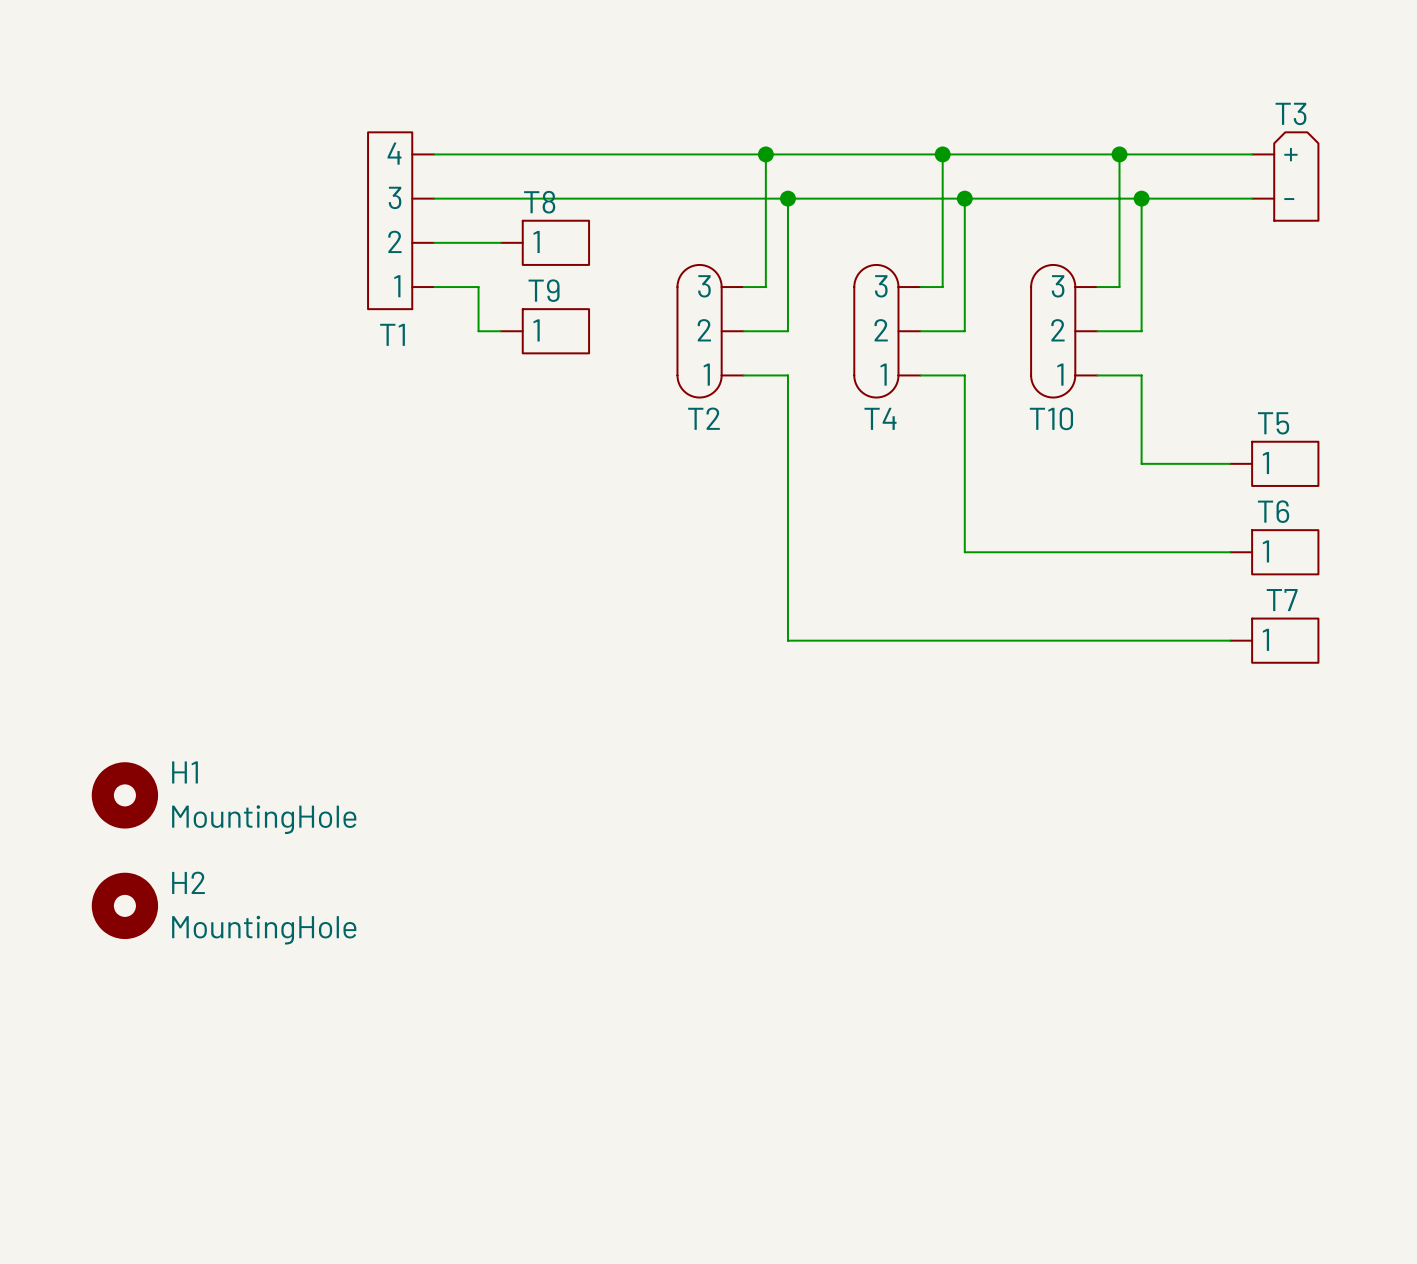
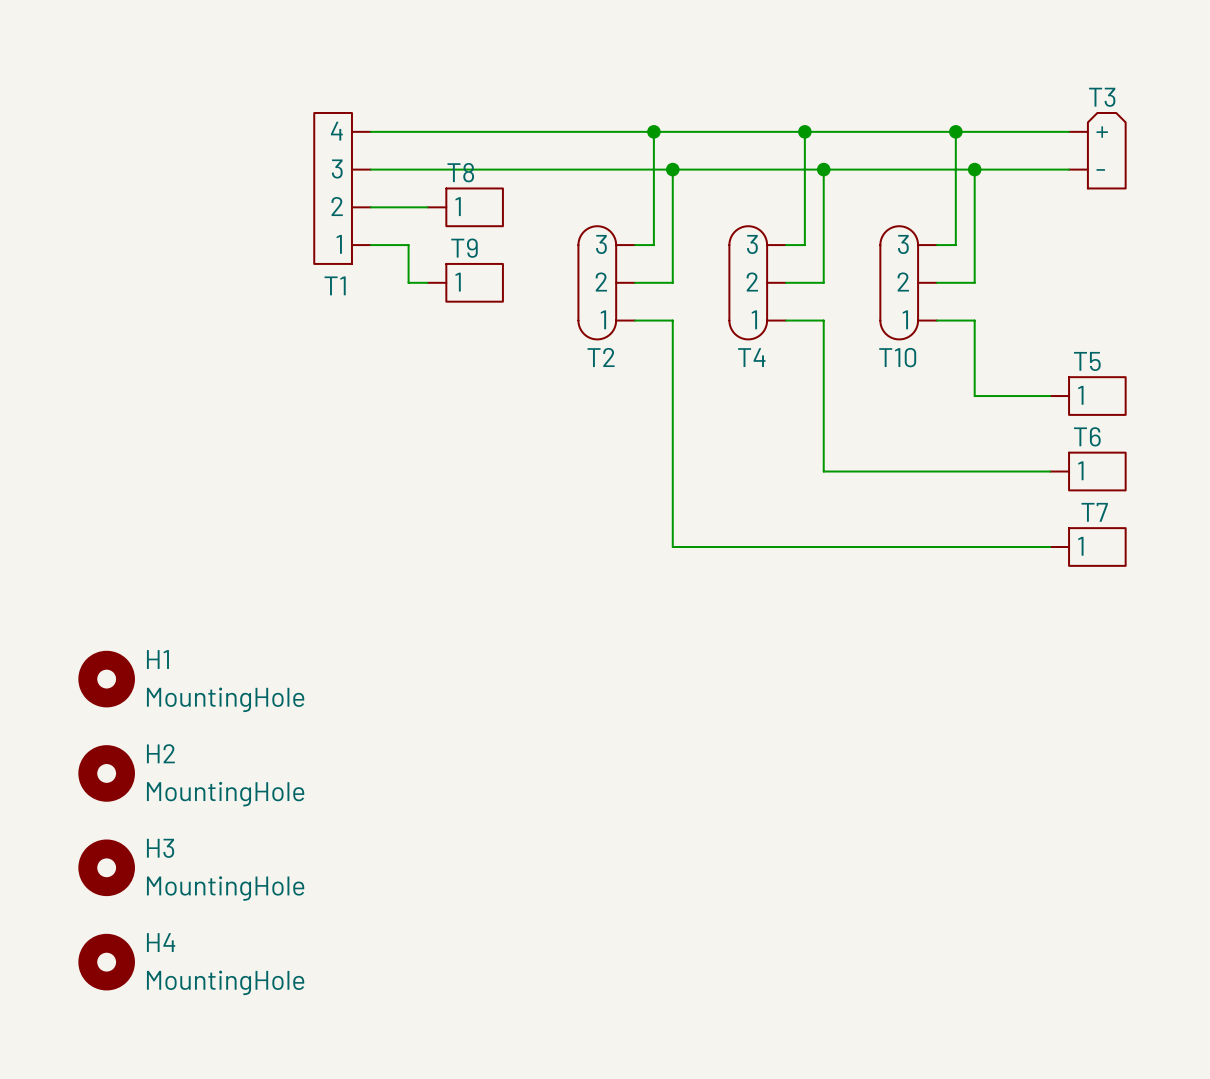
H3: none -> MountingHole (106, 867)
H4: none -> MountingHole (106, 962)

